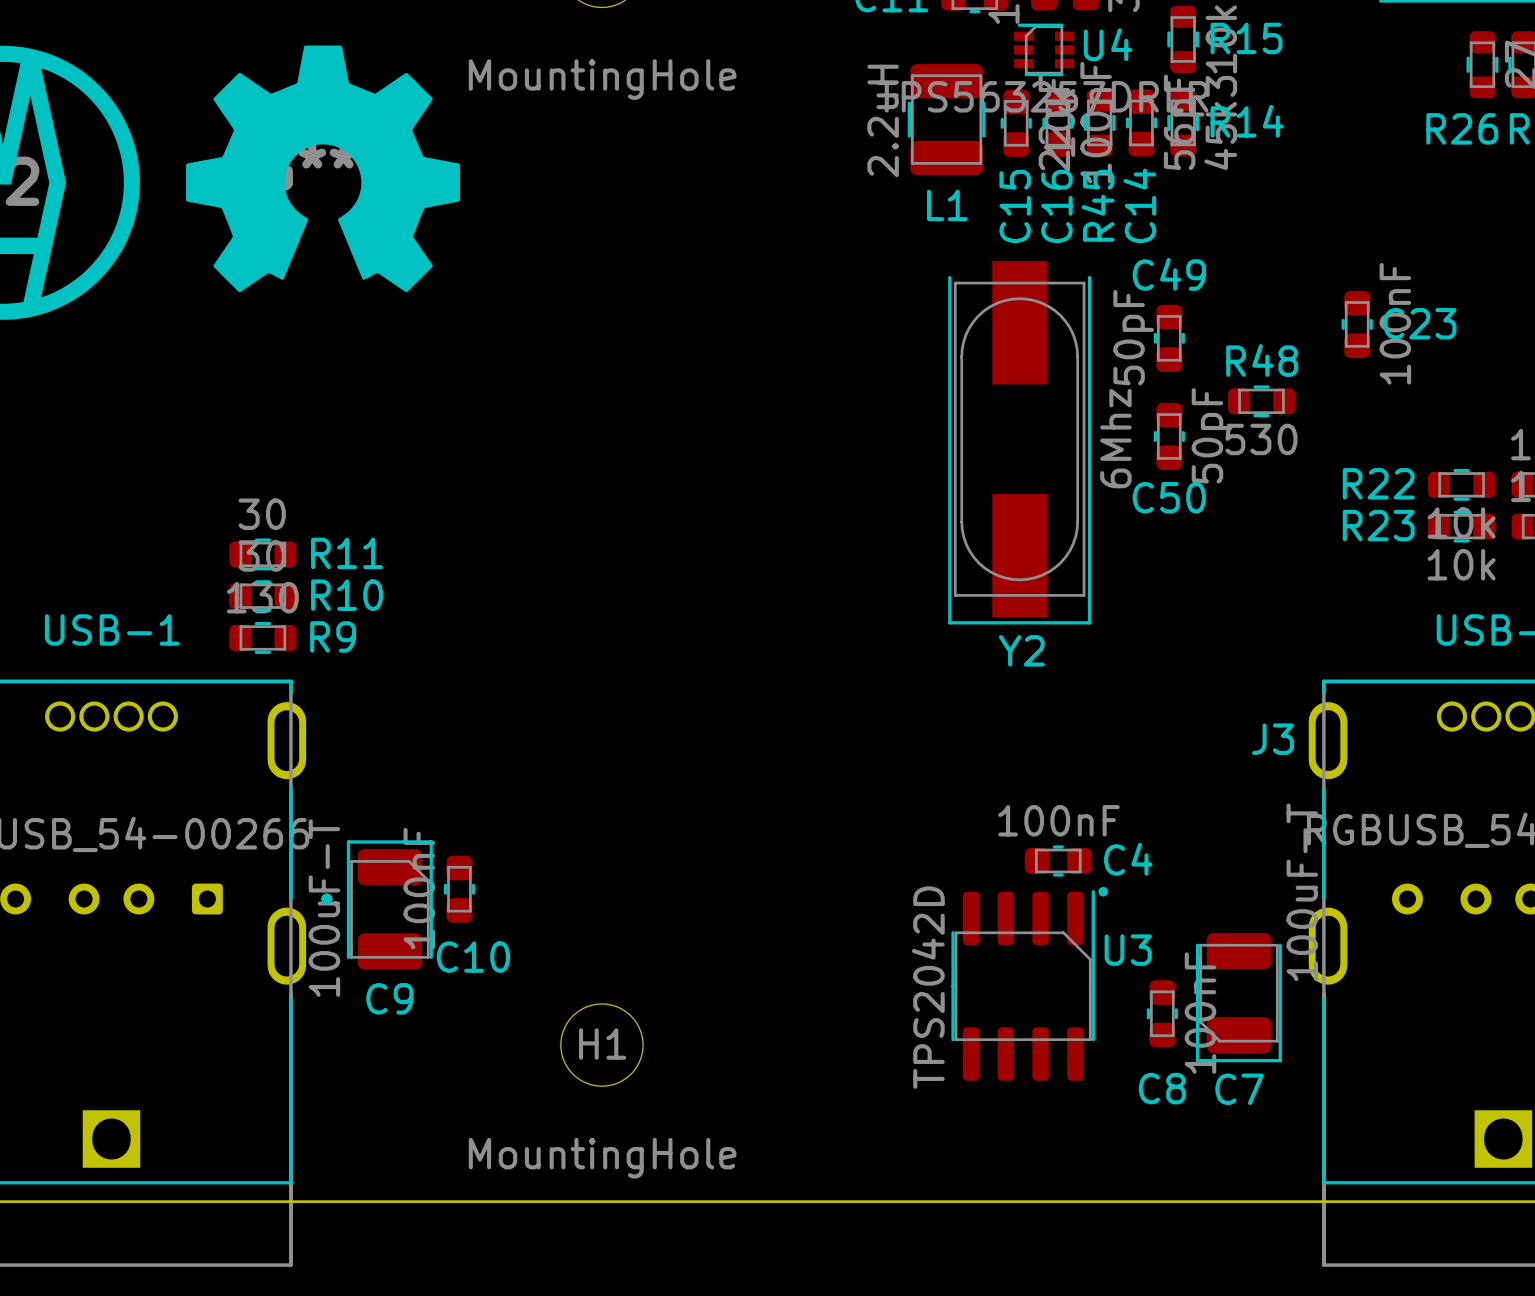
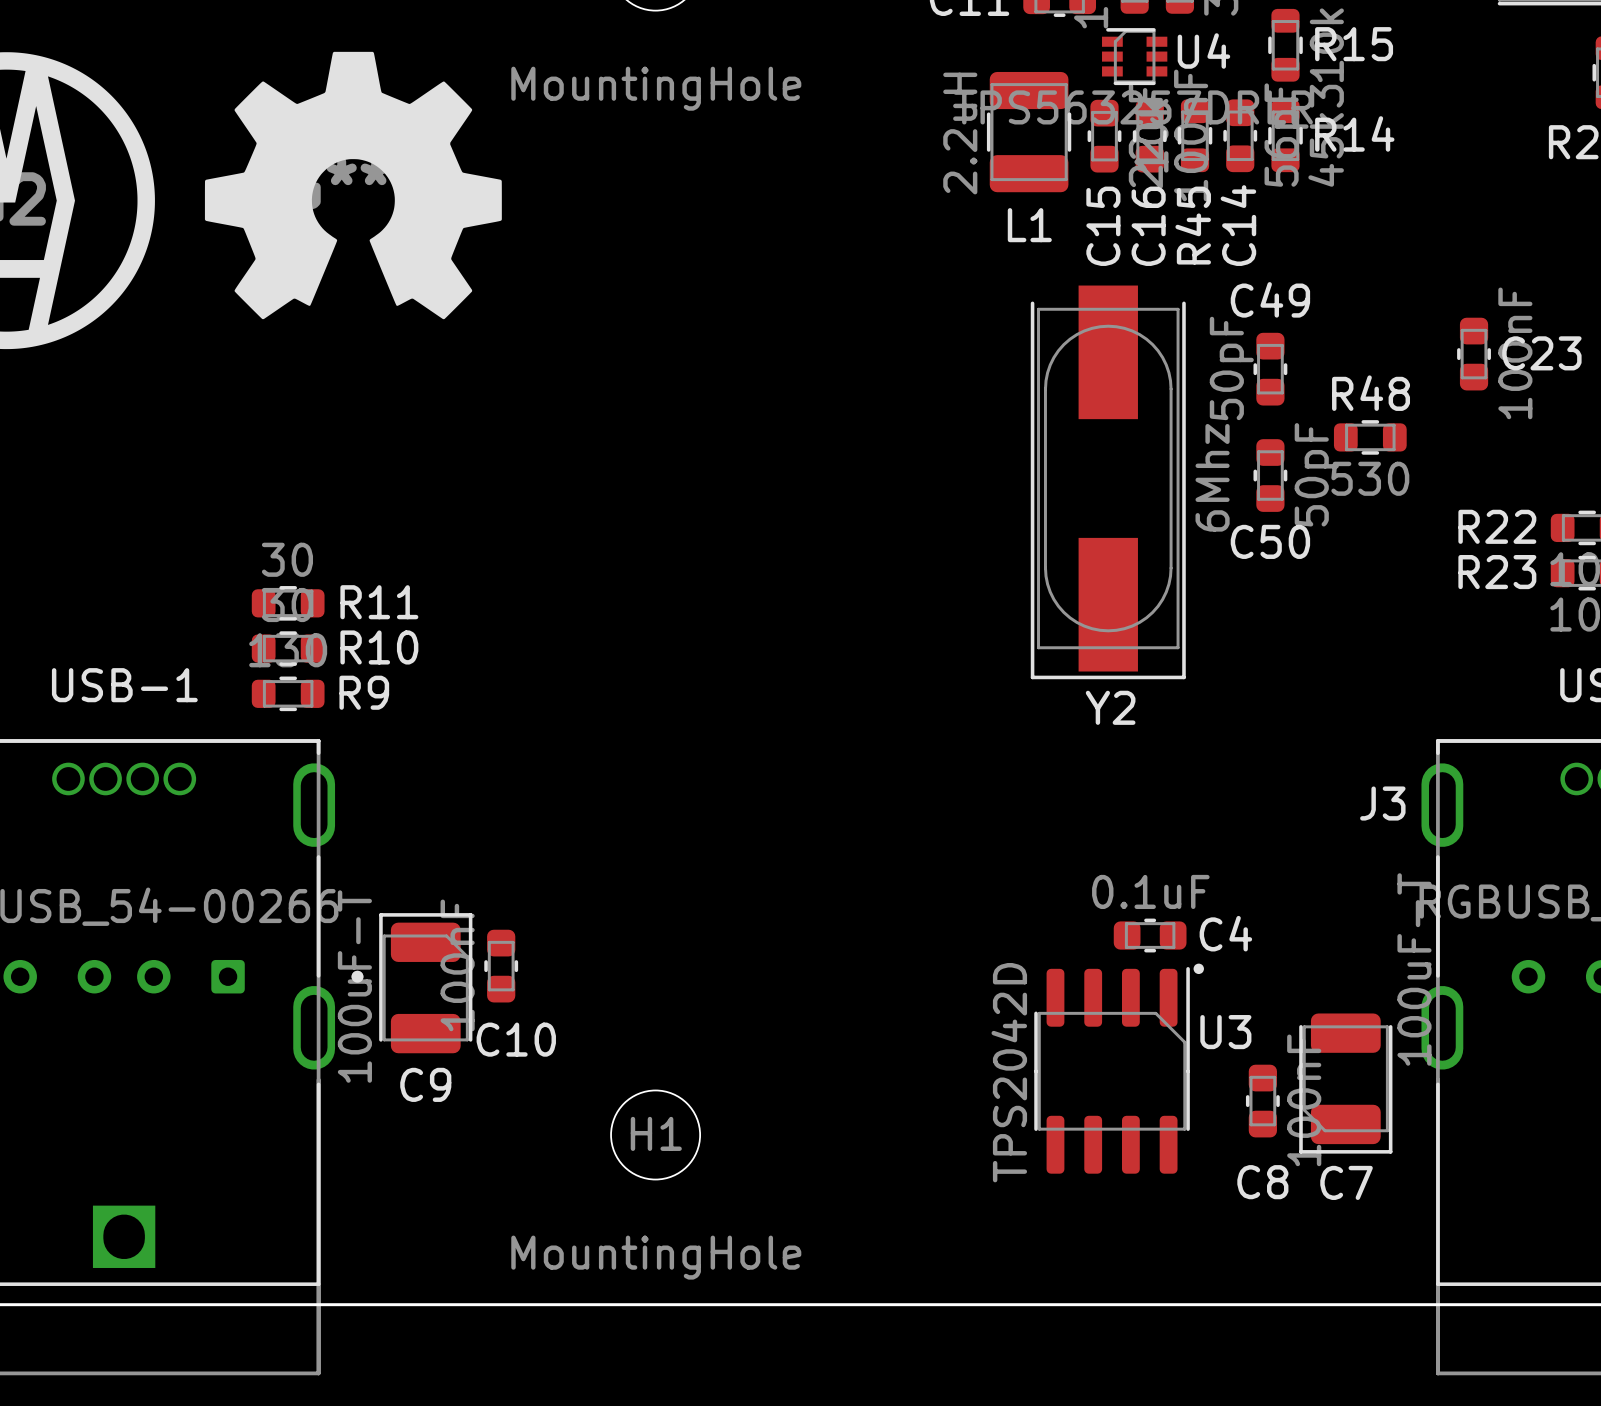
C4 value: 100nF (1058, 820) -> 0.1uF (1150, 891)

